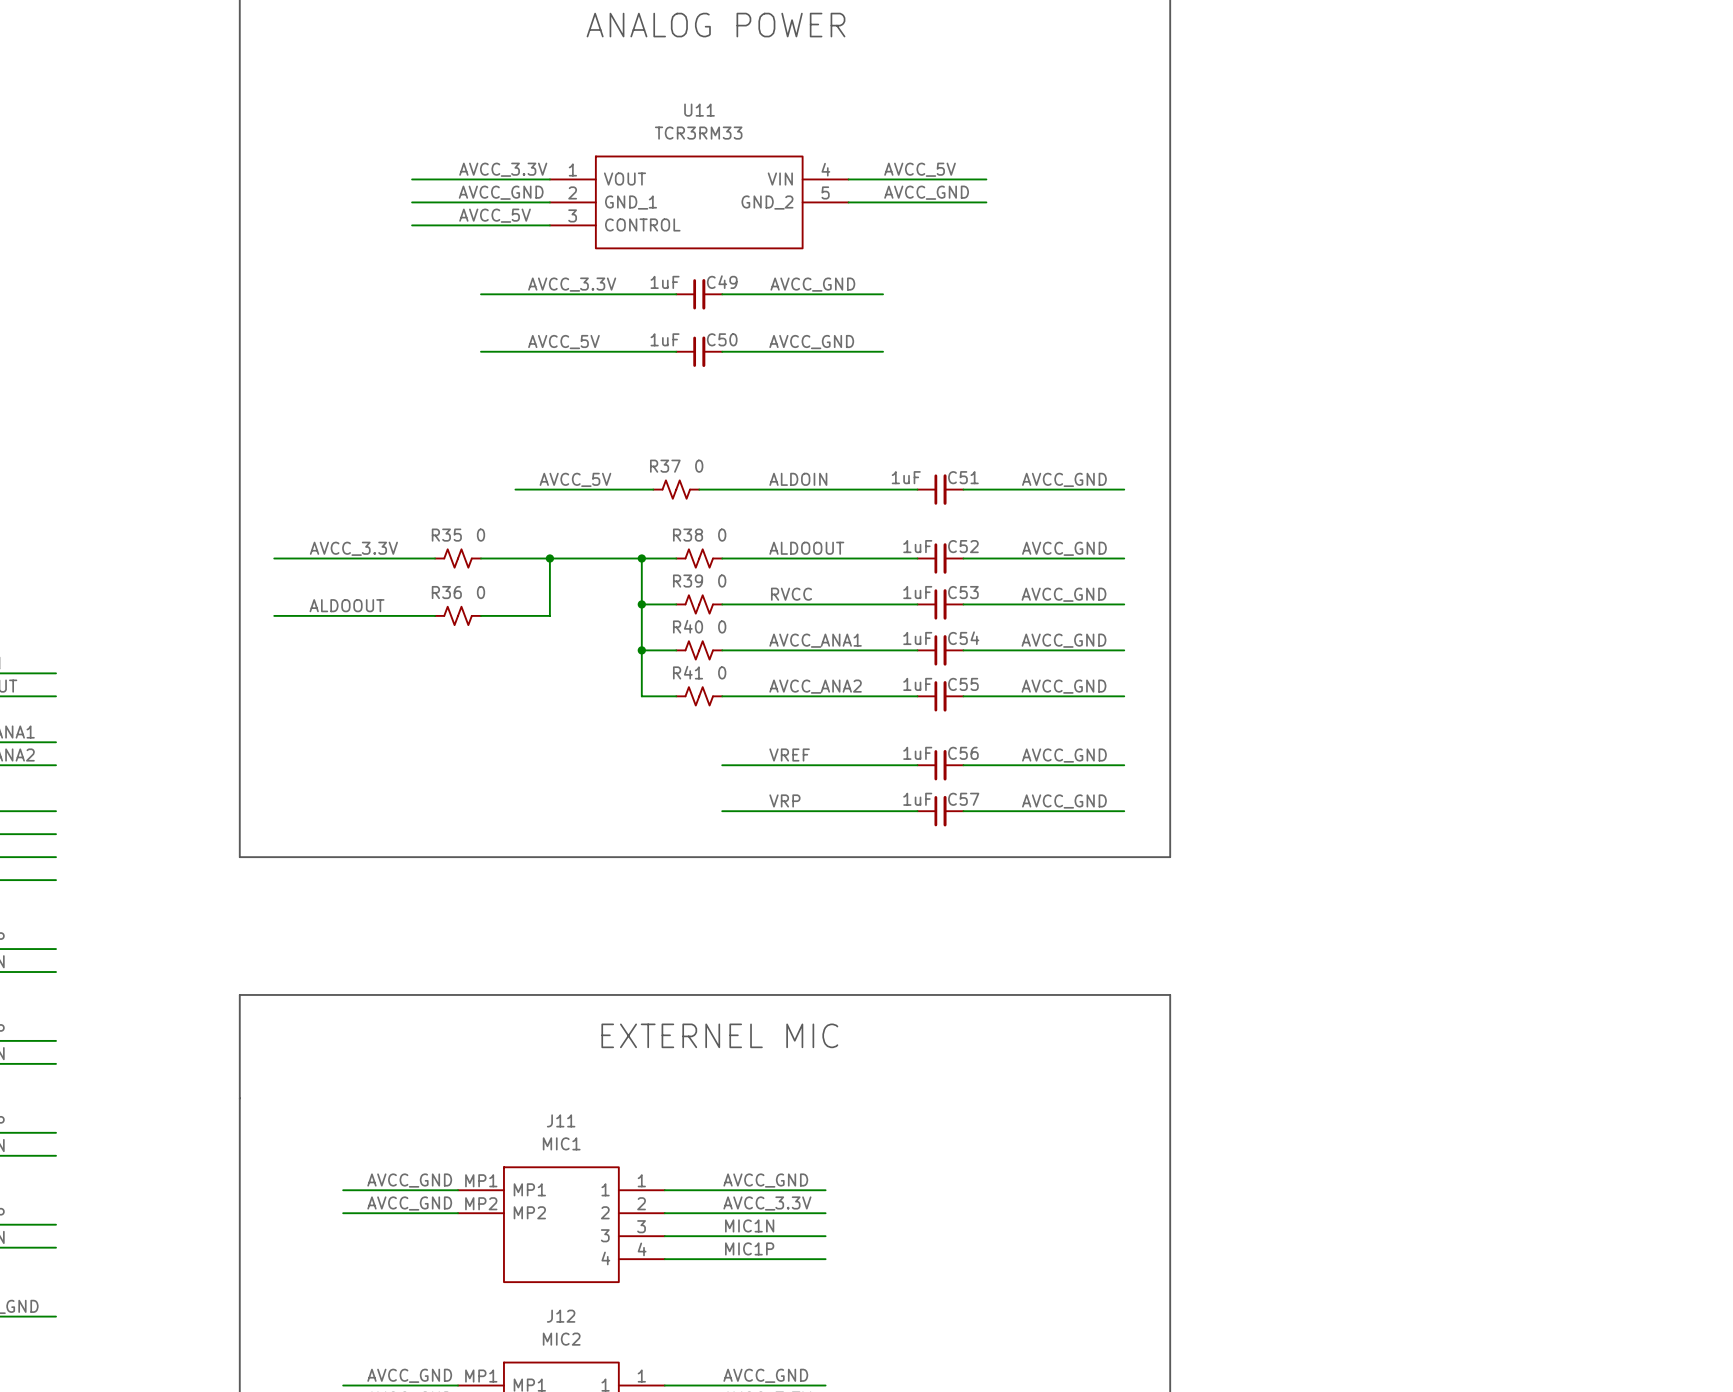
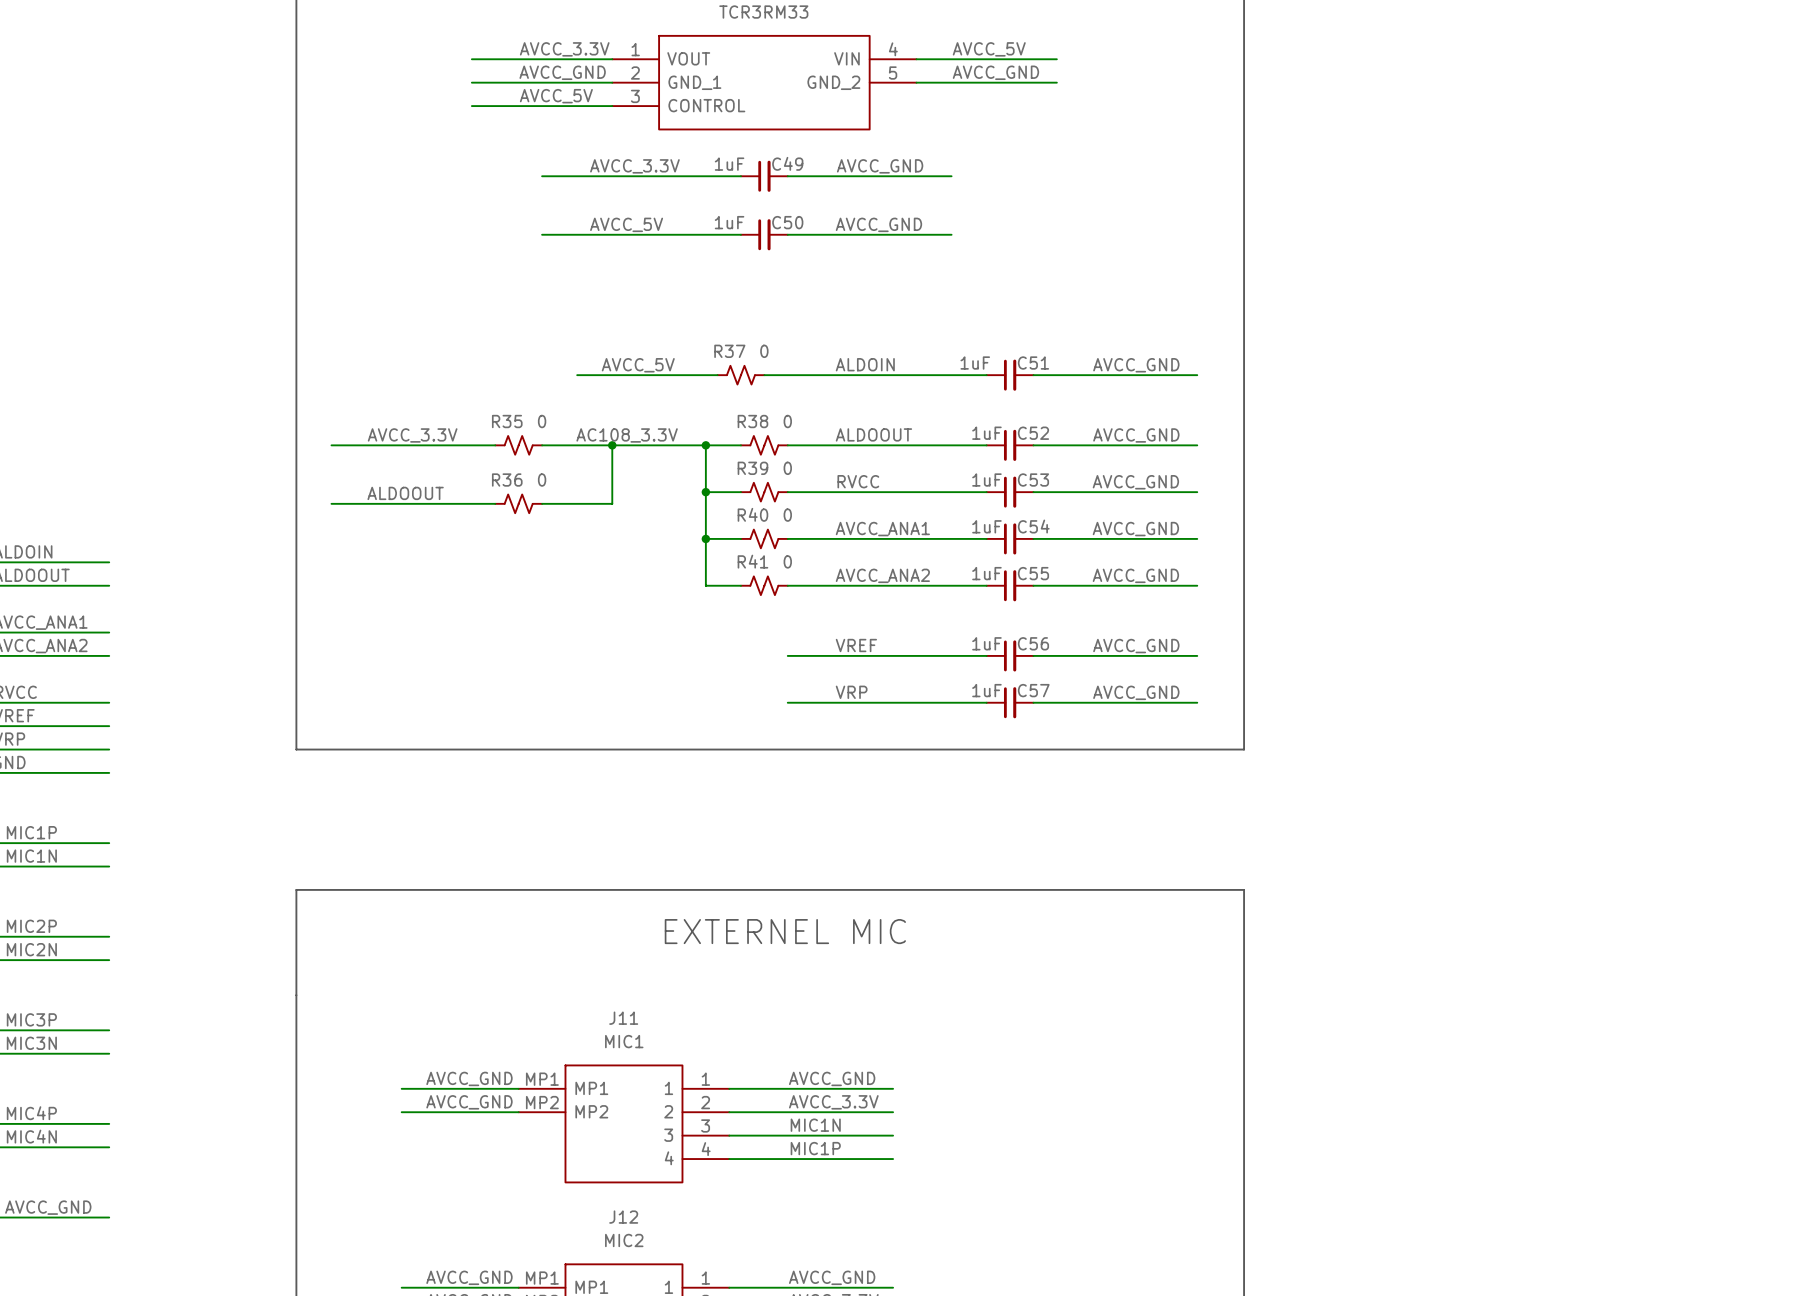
label: none -> AC108_3.3V (627, 435)

